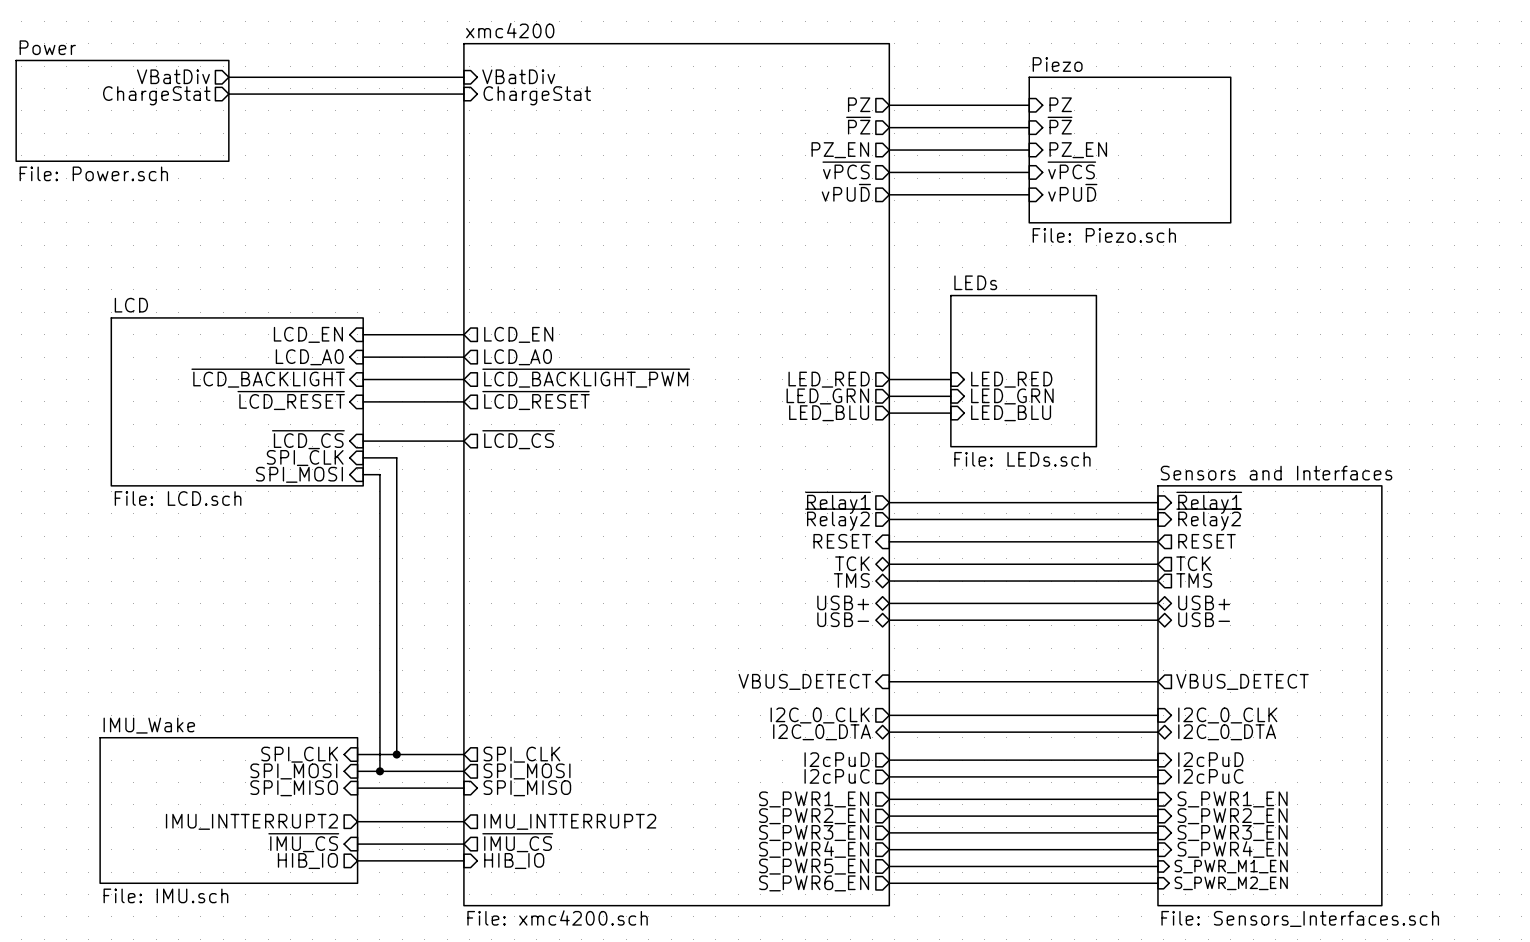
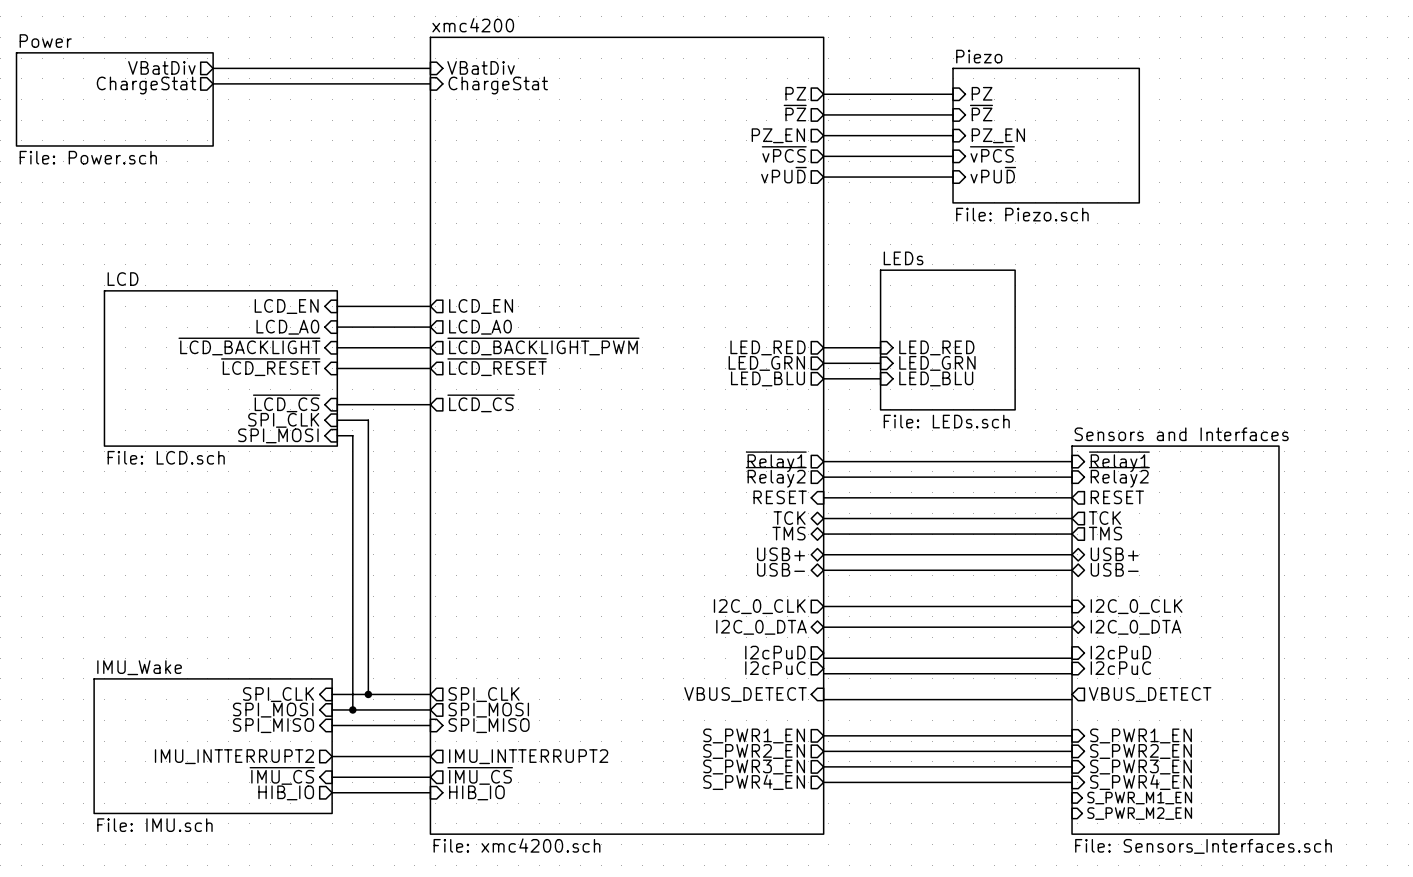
sheet pin shape: input (804, 681) -> bidirectional (761, 627)
sheet pin: VBUS_DETECT (804, 681) -> I2C_0_DTA (761, 627)
sheet pin shape: output (1242, 681) -> bidirectional (1135, 627)
sheet pin: VBUS_DETECT (1242, 681) -> I2C_0_DTA (1135, 627)
sheet pin position: I2C_0_CLK (820, 715) -> I2C_0_CLK (759, 606)
sheet pin position: I2C_0_CLK (1227, 715) -> I2C_0_CLK (1136, 606)
sheet pin: I2C_0_DTA (822, 732) -> none
sheet pin: I2C_0_DTA (1227, 732) -> none
sheet pin: none -> VBUS_DETECT (745, 694)
sheet pin: none -> VBUS_DETECT (1150, 694)
sheet pin position: I2cPuD (837, 759) -> I2cPuD (775, 652)
sheet pin position: I2cPuD (1210, 759) -> I2cPuD (1120, 652)
sheet pin position: I2cPuC (837, 776) -> I2cPuC (775, 668)
wire: (889, 776) (1157, 776) -> (823, 606) (1072, 606)
sheet pin position: I2cPuC (1210, 776) -> I2cPuC (1120, 668)
hierarchical label: S_PWR5_EN (814, 866) -> none
wire: (889, 866) (1157, 866) -> none
hierarchical label: S_PWR6_EN (814, 883) -> none
wire: (889, 883) (1157, 883) -> none

